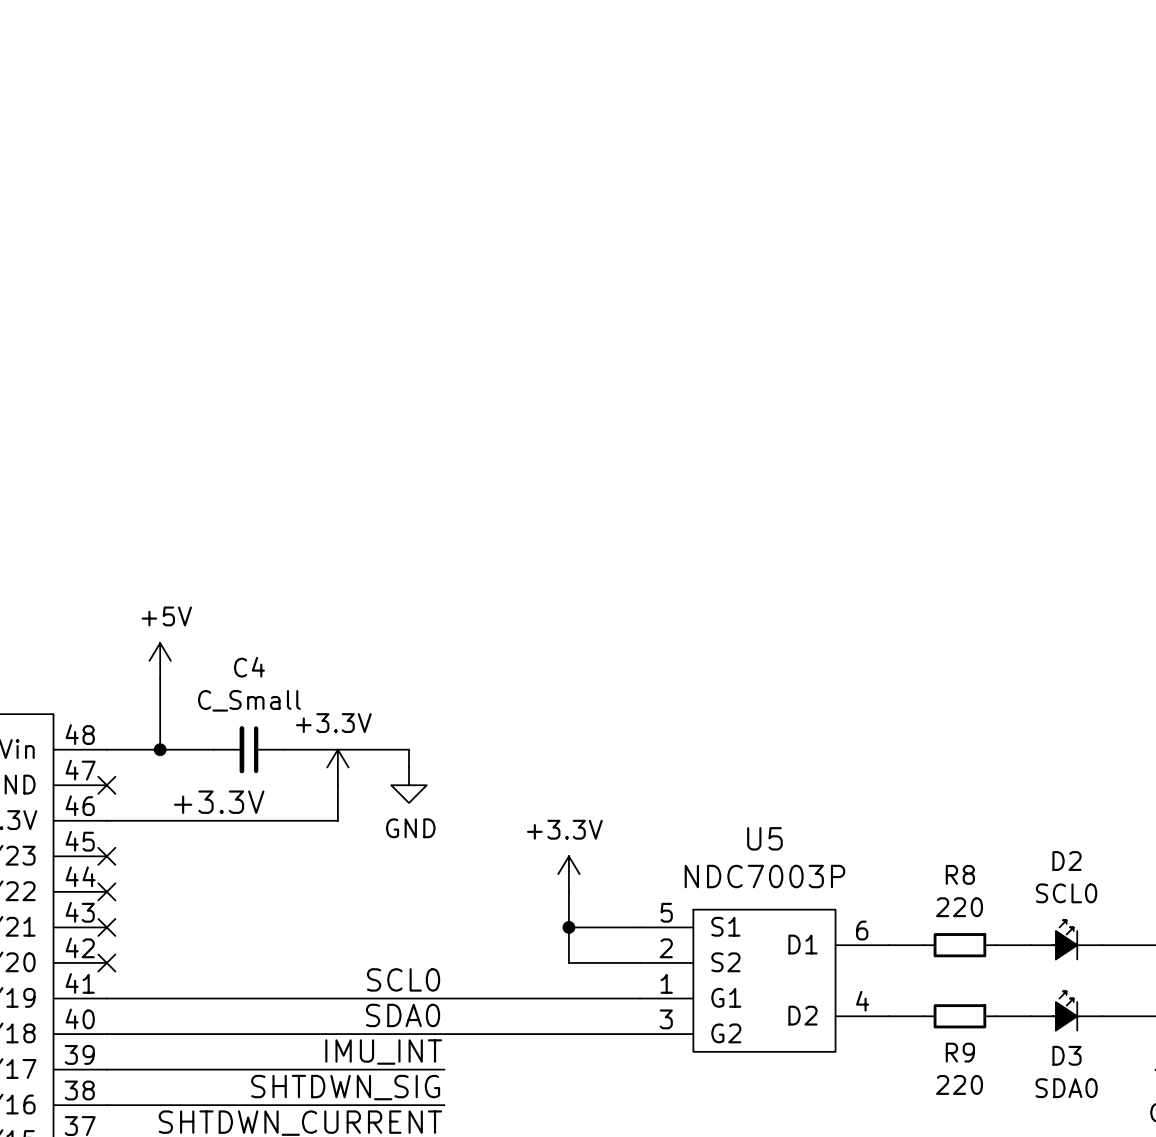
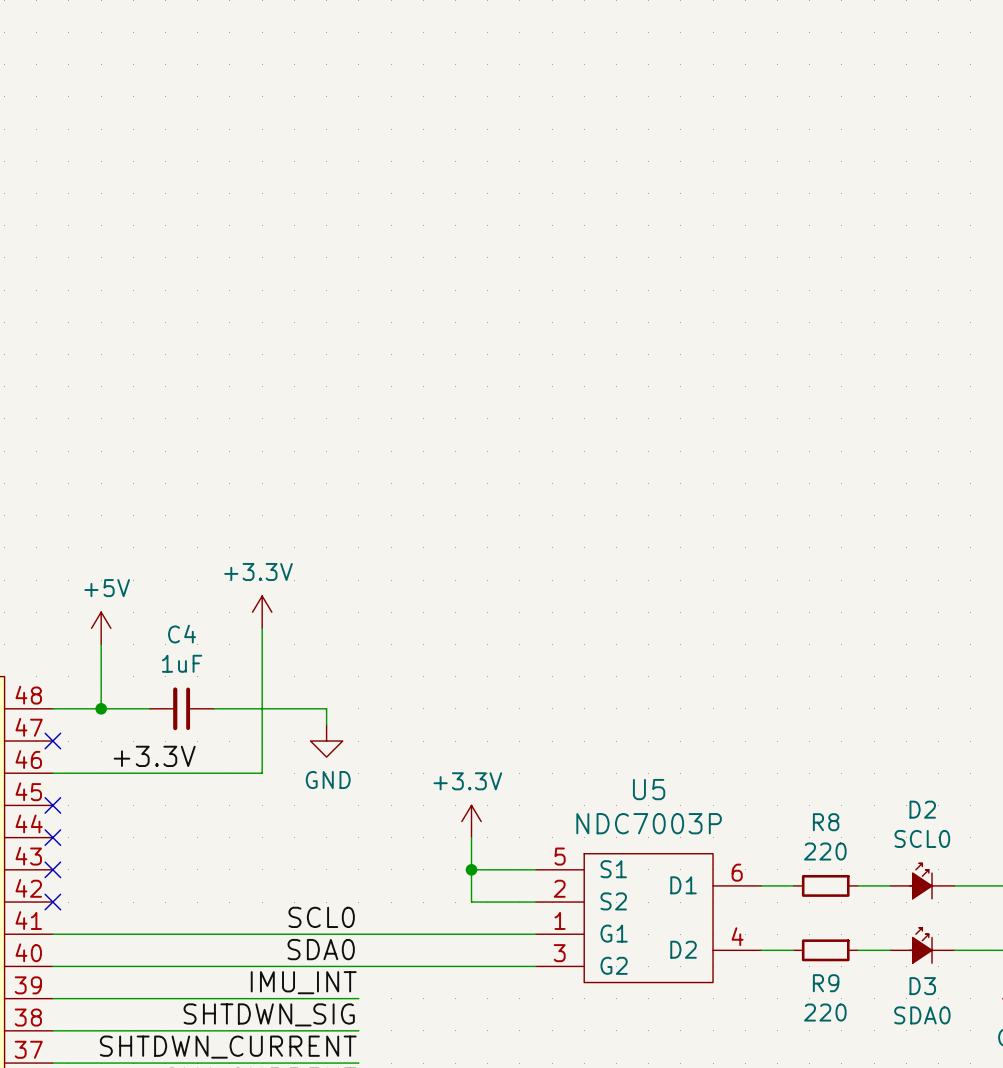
wire: none -> (262, 628) (262, 741)
C4 value: C_Small (249, 700) -> 1uF (182, 663)
power symbol position: +3.3V (337, 767) -> +3.3V (262, 612)

